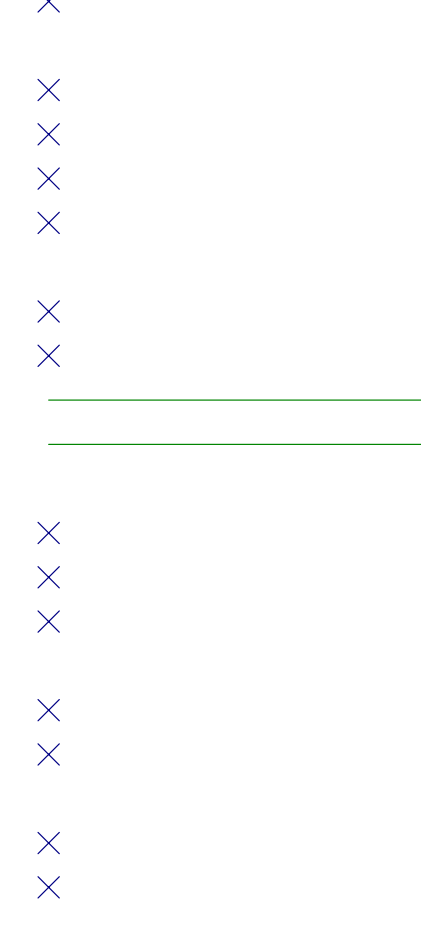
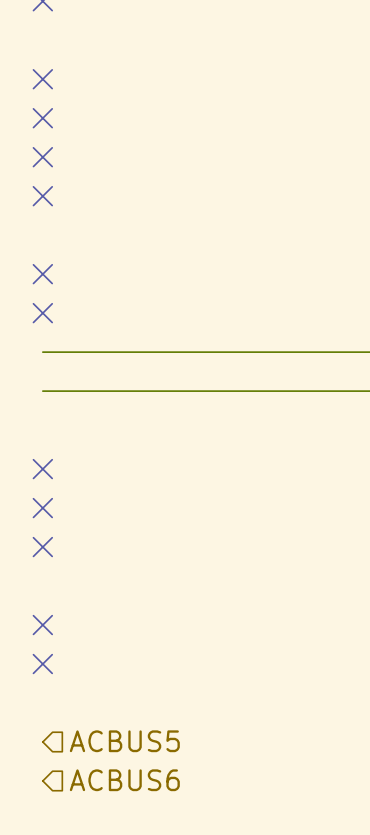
hierarchical label: none -> ACBUS5 (124, 741)
no-connect mark: (48, 843) -> none
hierarchical label: none -> ACBUS6 (124, 780)
no-connect mark: (48, 887) -> none

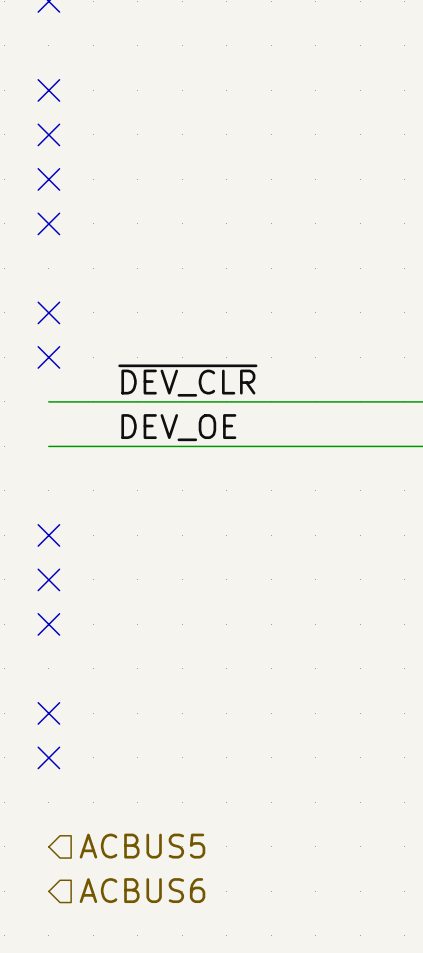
label: none -> ~{DEV_CLR} (187, 380)
label: none -> DEV_OE (178, 427)

